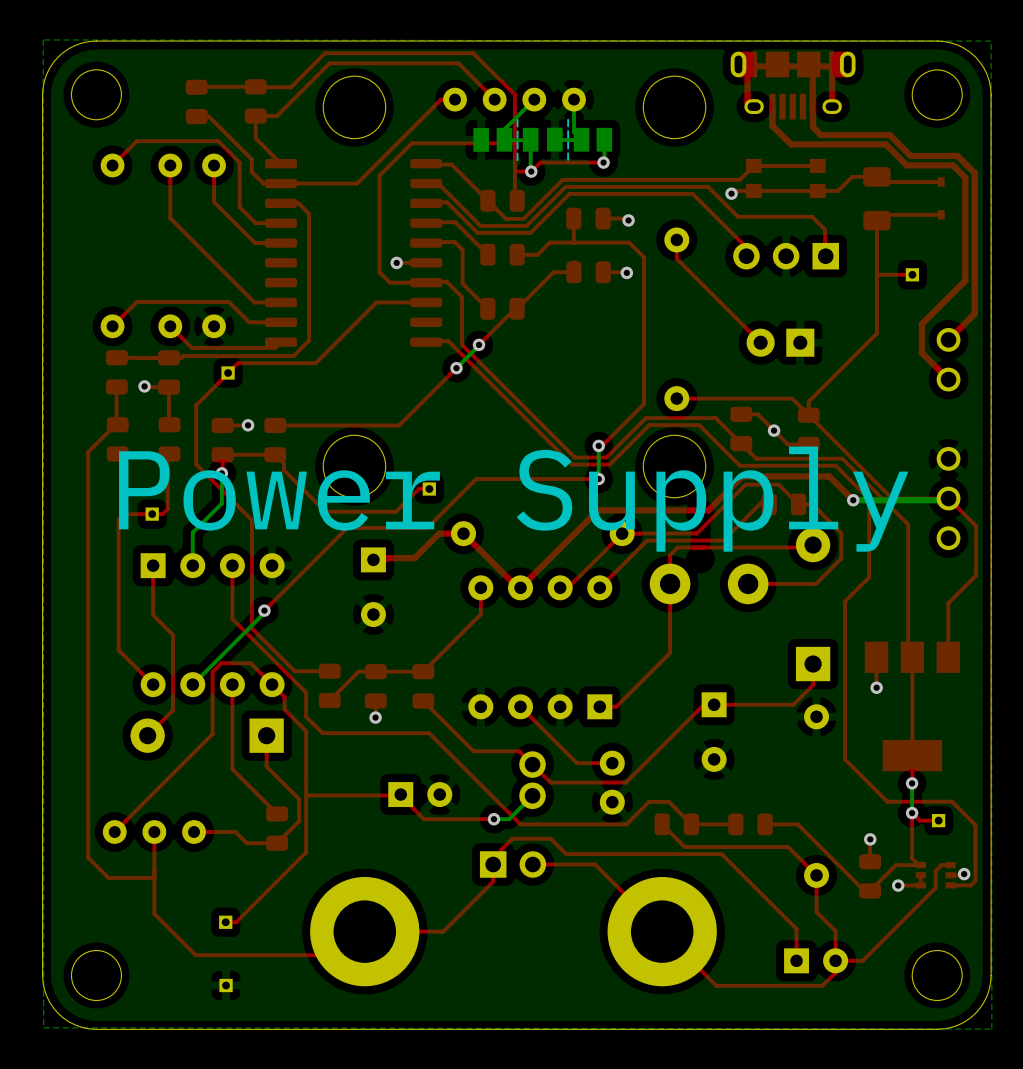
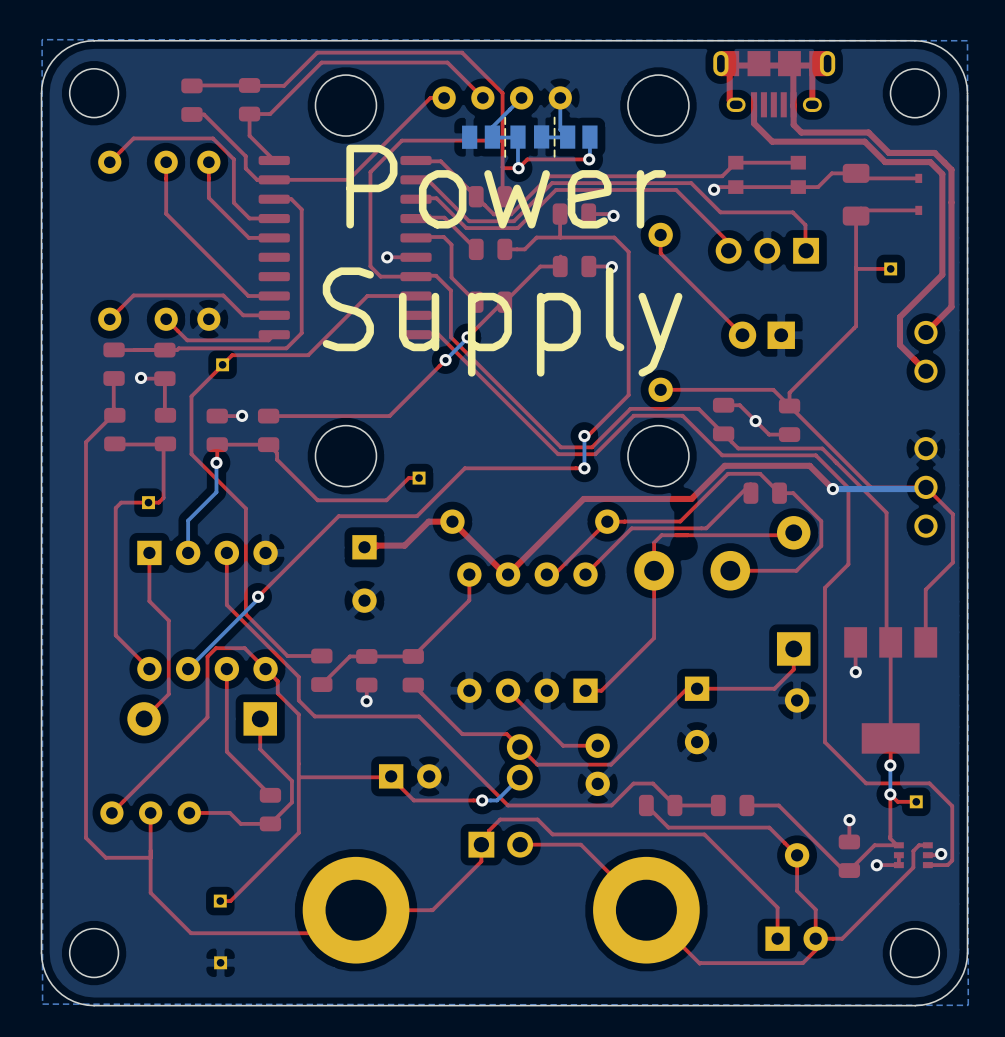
text: none -> Power (506, 186)
text: none -> Supply (502, 322)
text: Power Supply (513, 499) -> none

